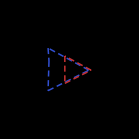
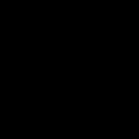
bottom zone outline: (48, 48) (88, 70) (48, 90) (48, 48) -> none
top zone outline: (64, 55) (91, 70) (64, 83) (64, 55) -> none

